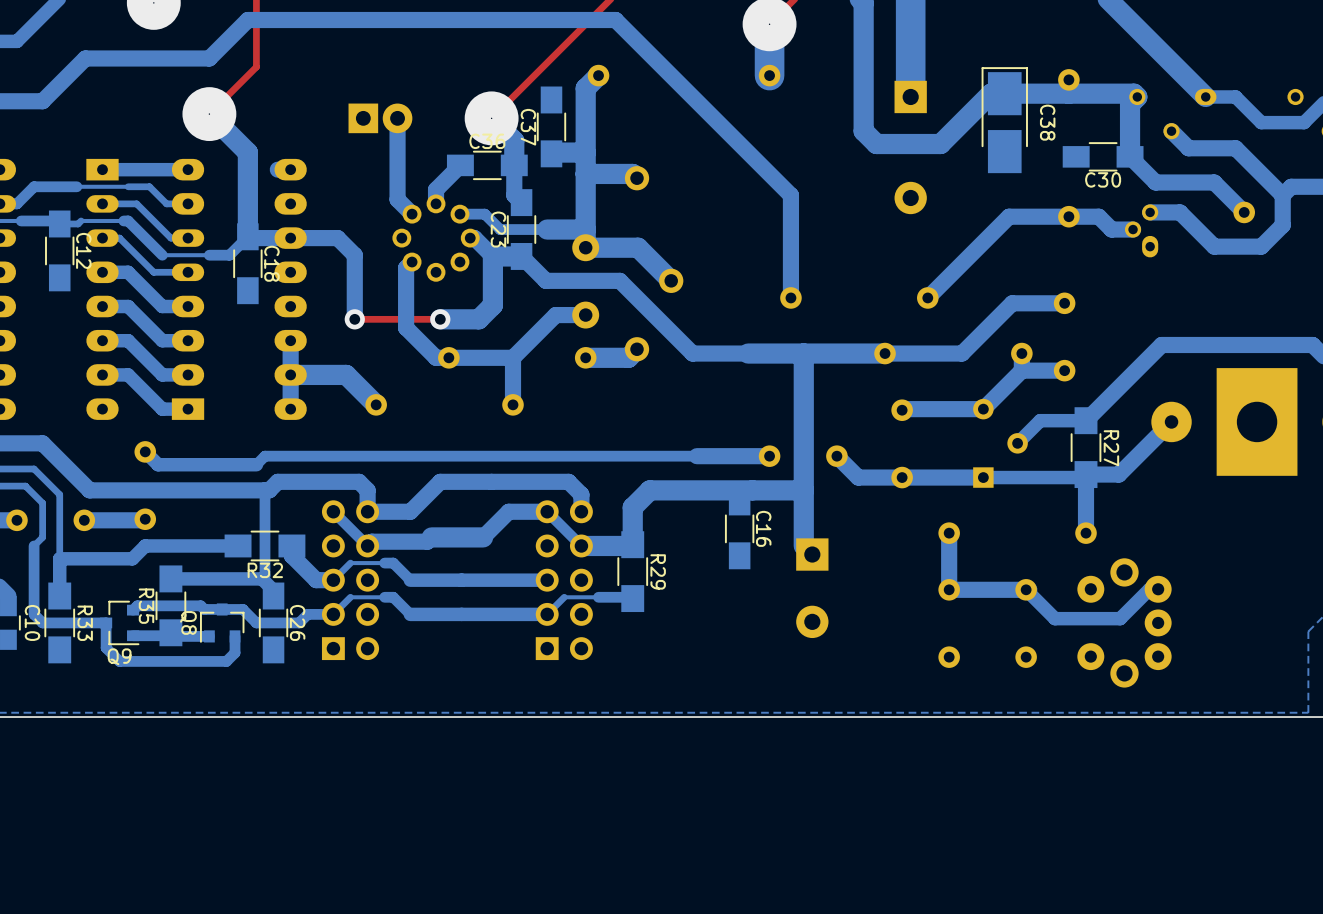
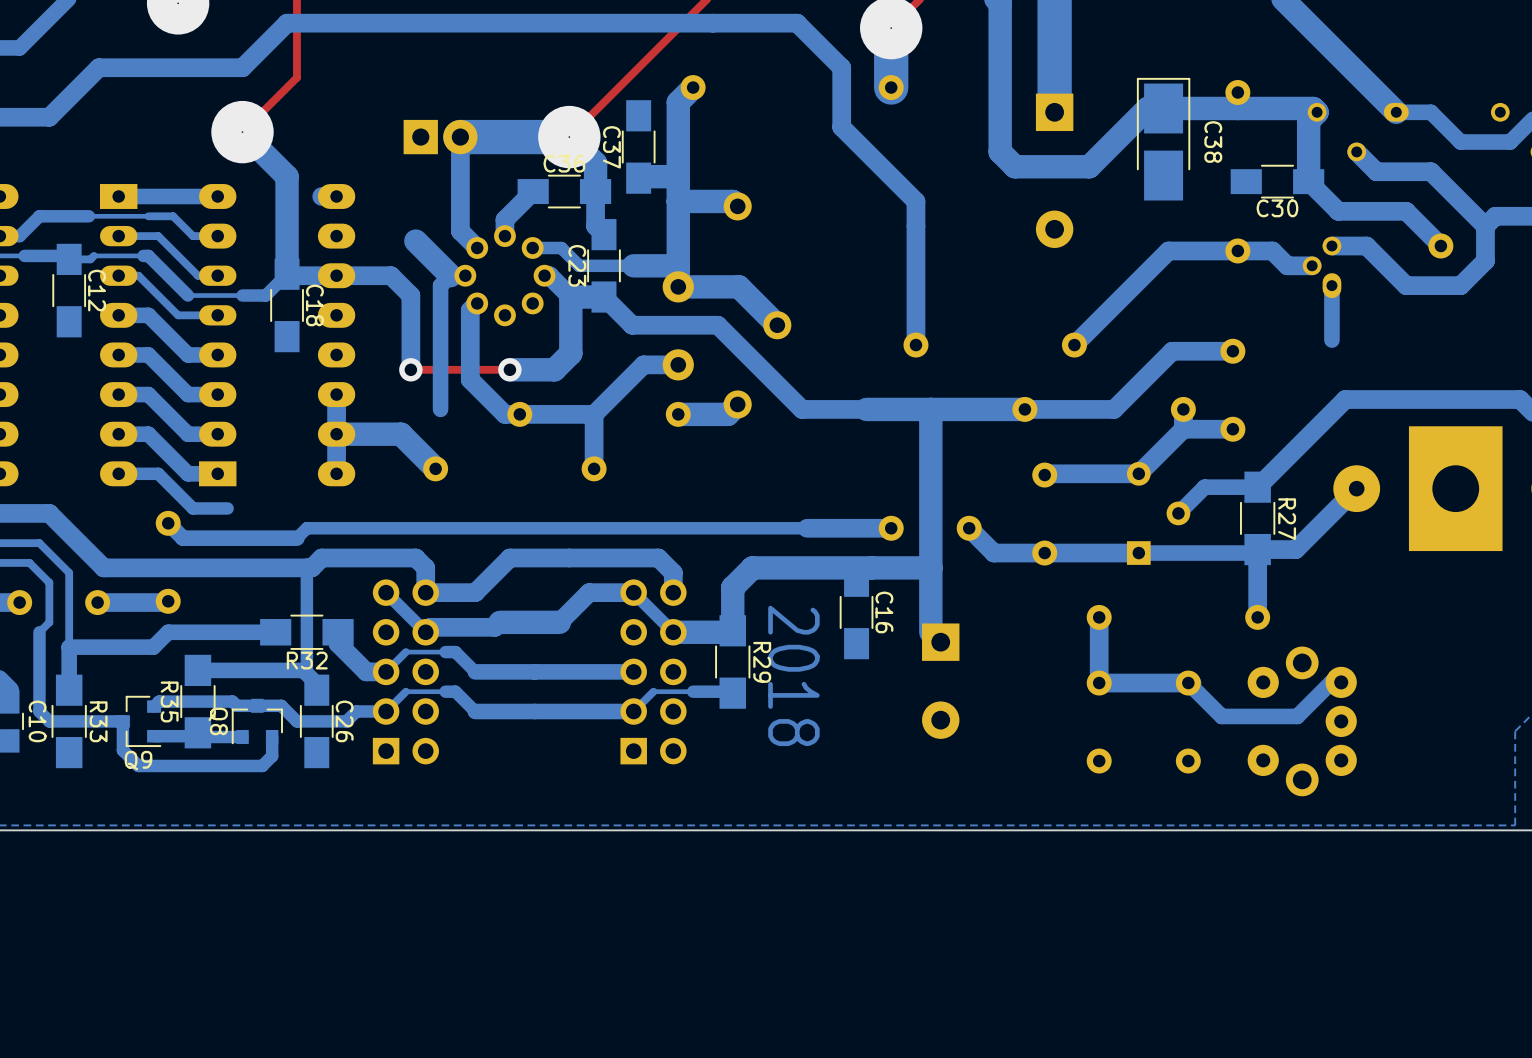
bottom track: (615, 20) (790, 195) -> (712, 23) (797, 23) (841, 67) (841, 127) (915, 201) (915, 226)
bottom track: none -> (569, 137) (460, 137)
bottom track: none -> (415, 241) (450, 275)
bottom track: none -> (450, 275) (440, 285) (440, 409)
bottom track: none -> (1331, 285) (1331, 340)
bottom track: none -> (118, 473) (158, 473) (192, 508) (227, 508)
text: none -> 2018 (793, 675)

